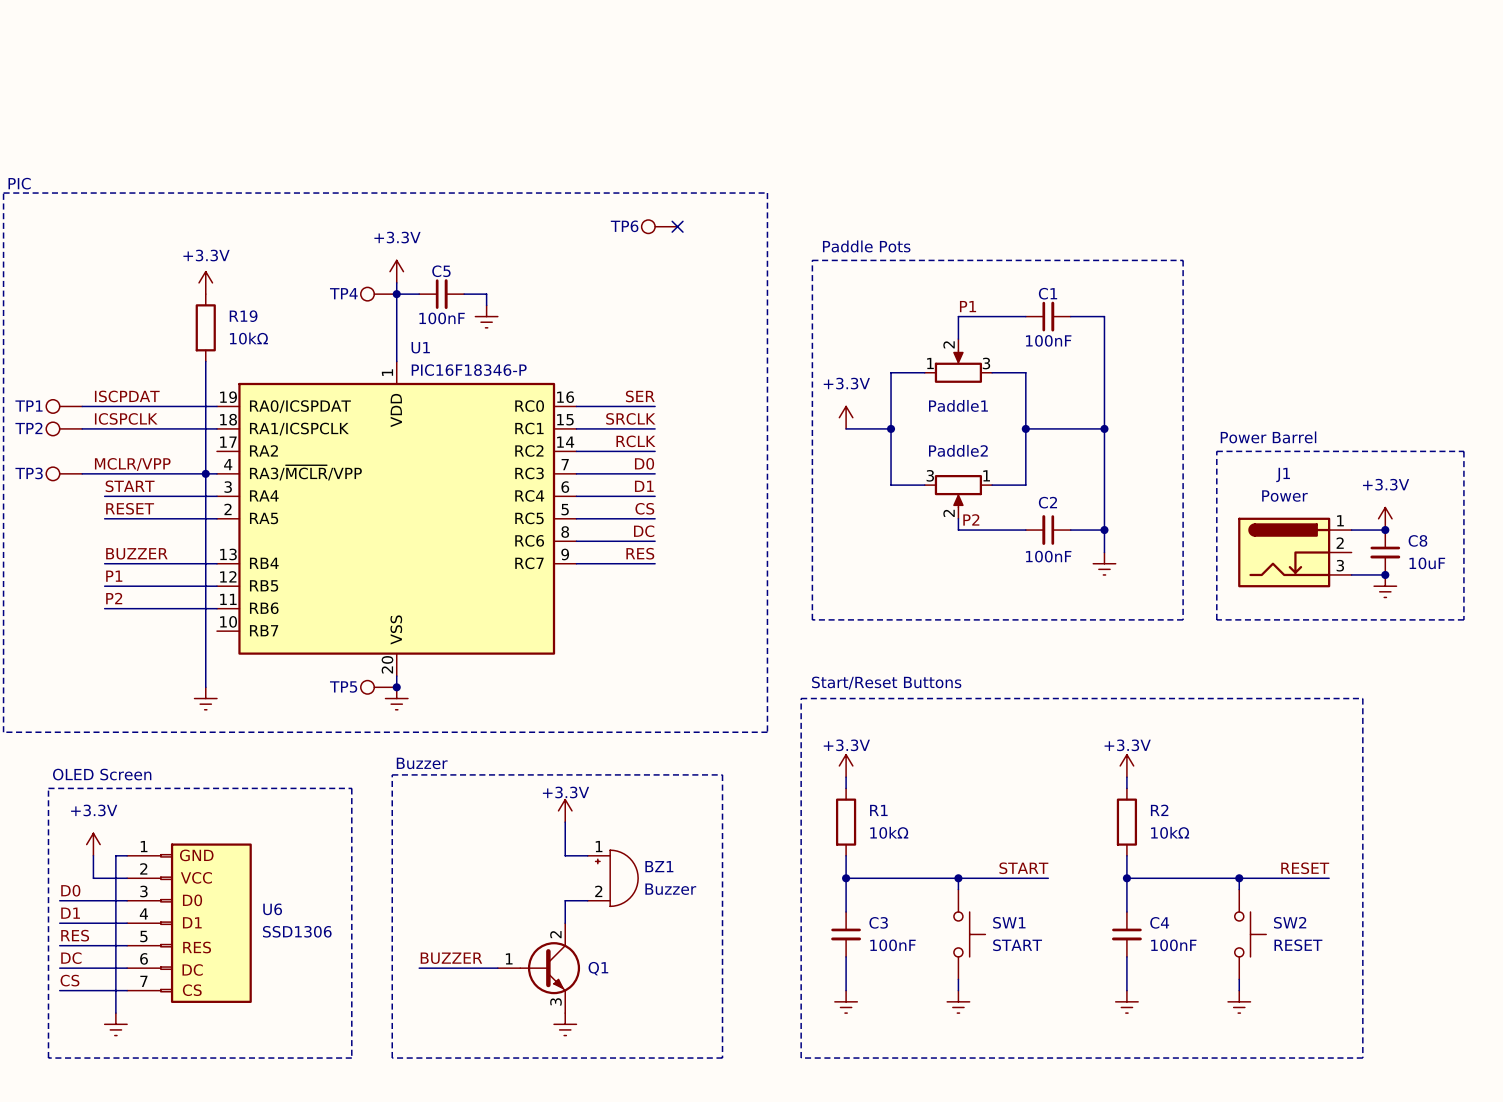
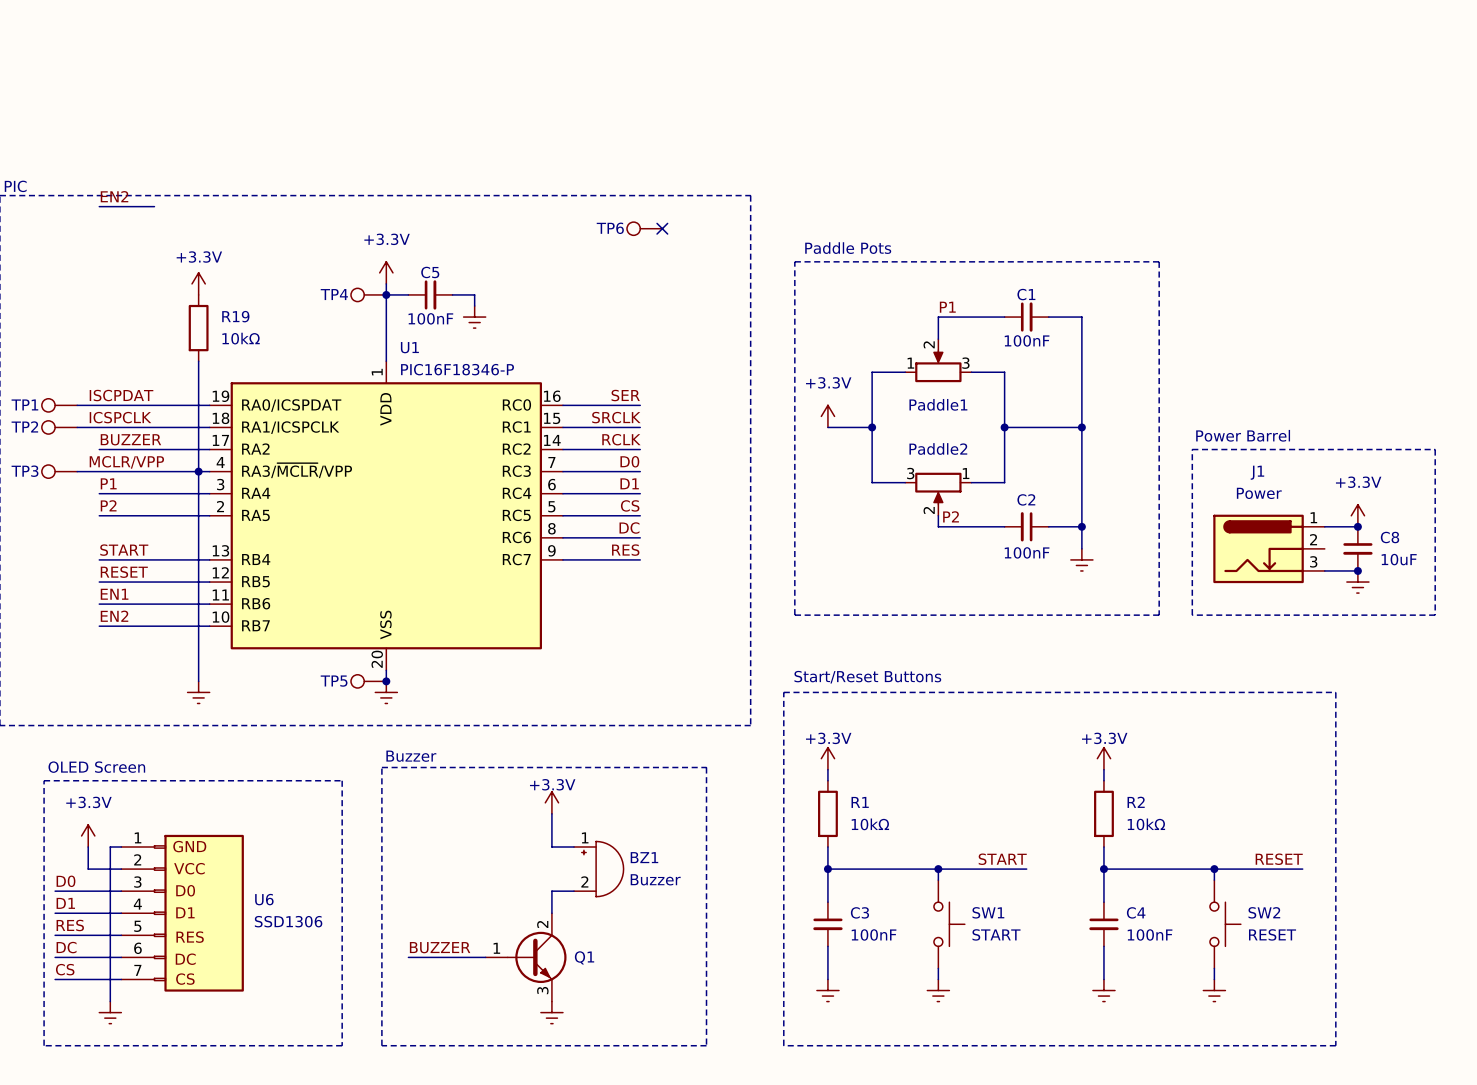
label: none -> EN2 (114, 196)
wire: none -> (99, 206) (154, 206)
label: none -> BUZZER (130, 439)
wire: none -> (99, 449) (209, 449)
label: START (130, 486) -> P1 (108, 483)
label: RESET (130, 508) -> P2 (108, 505)
label: BUZZER (136, 553) -> START (124, 550)
label: P1 (114, 576) -> RESET (124, 572)
label: P2 (114, 598) -> EN1 (114, 594)
label: none -> EN2 (114, 616)
wire: none -> (99, 626) (209, 626)

